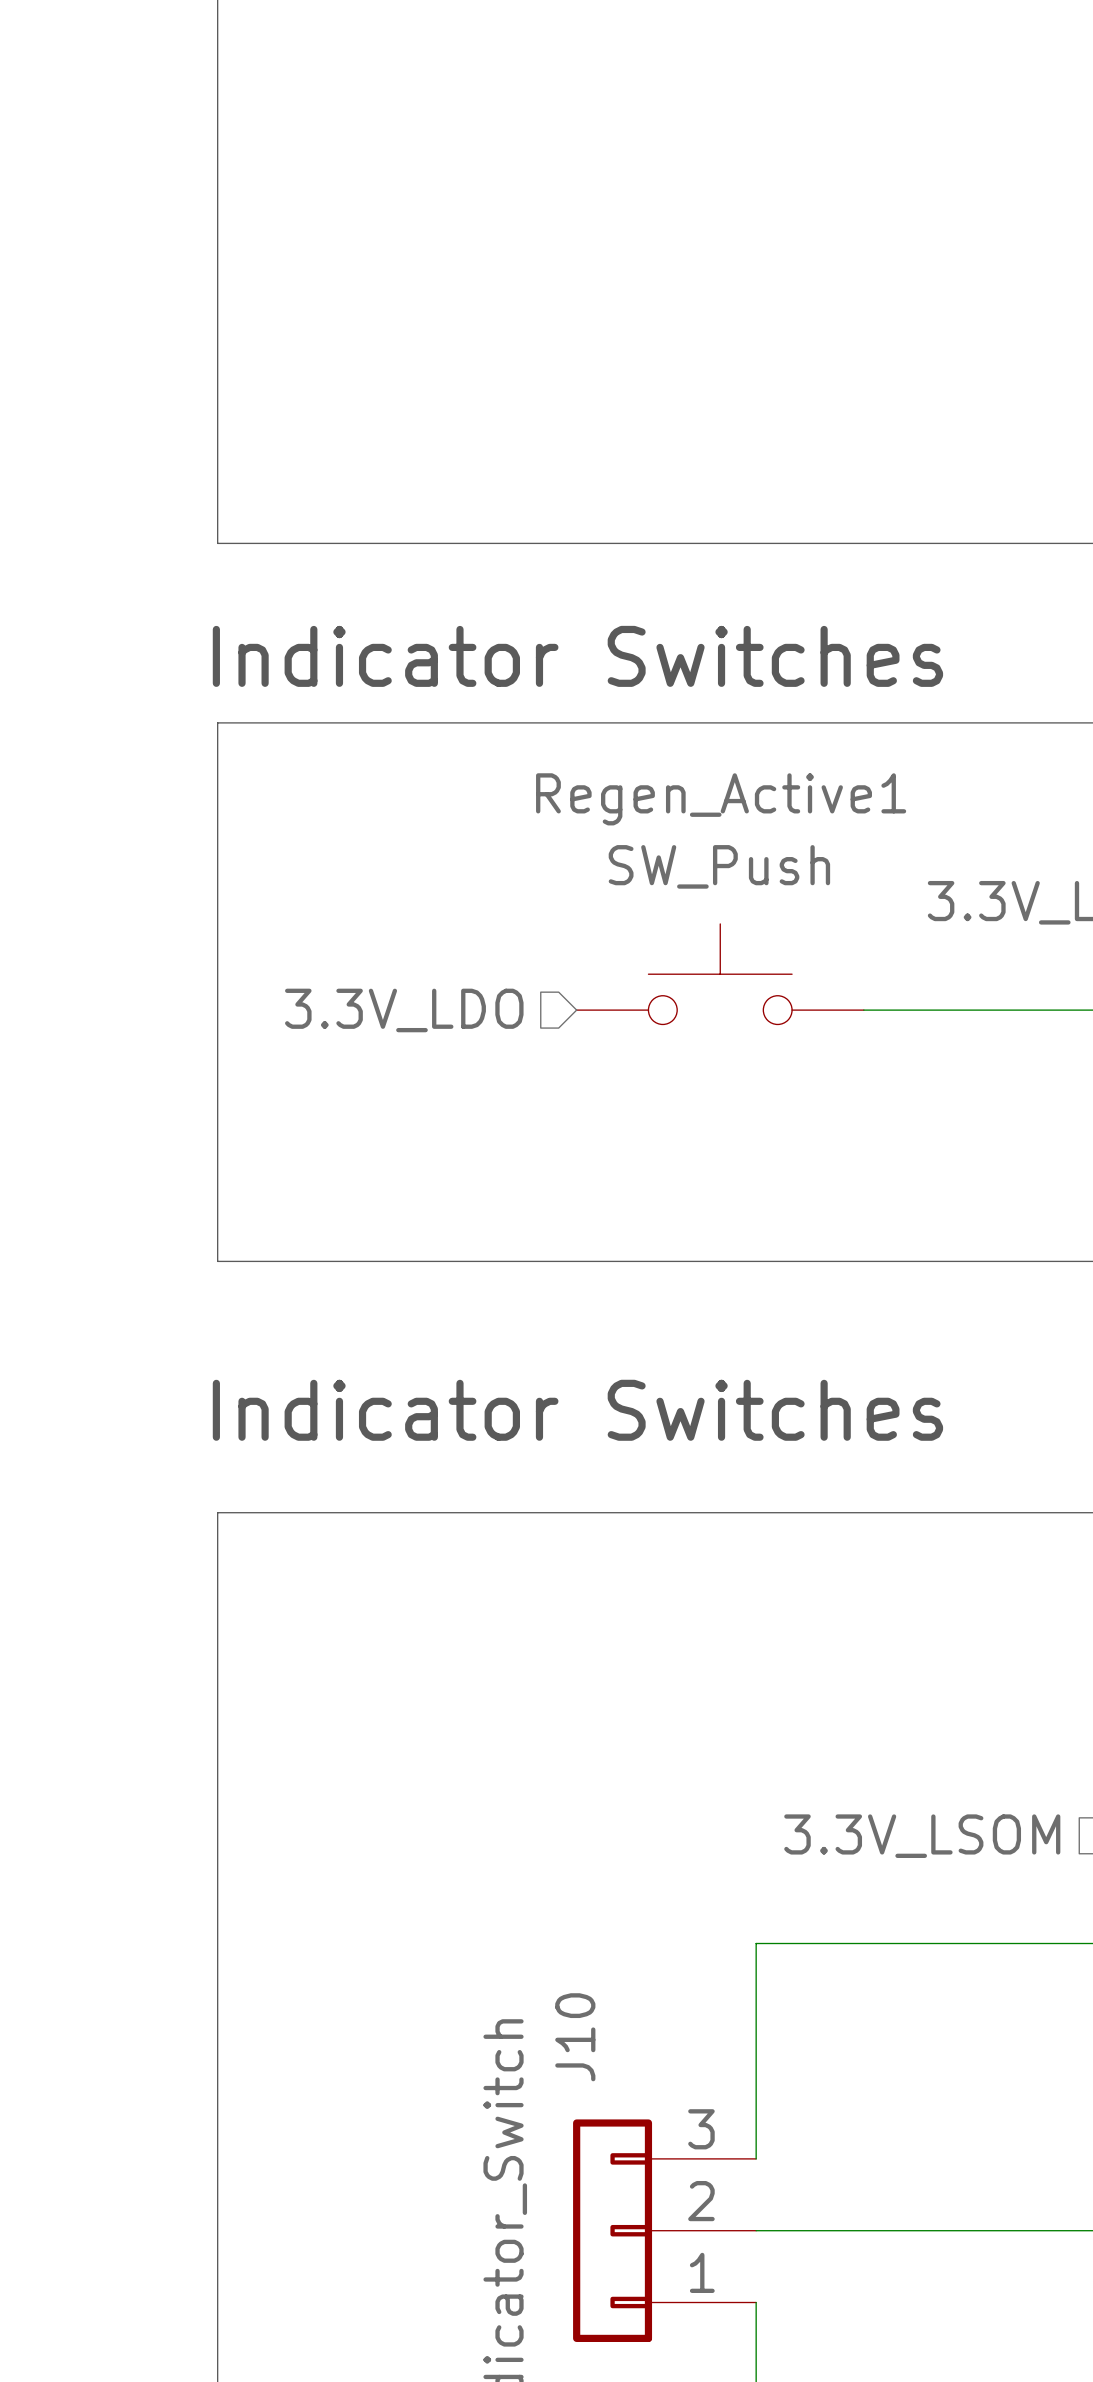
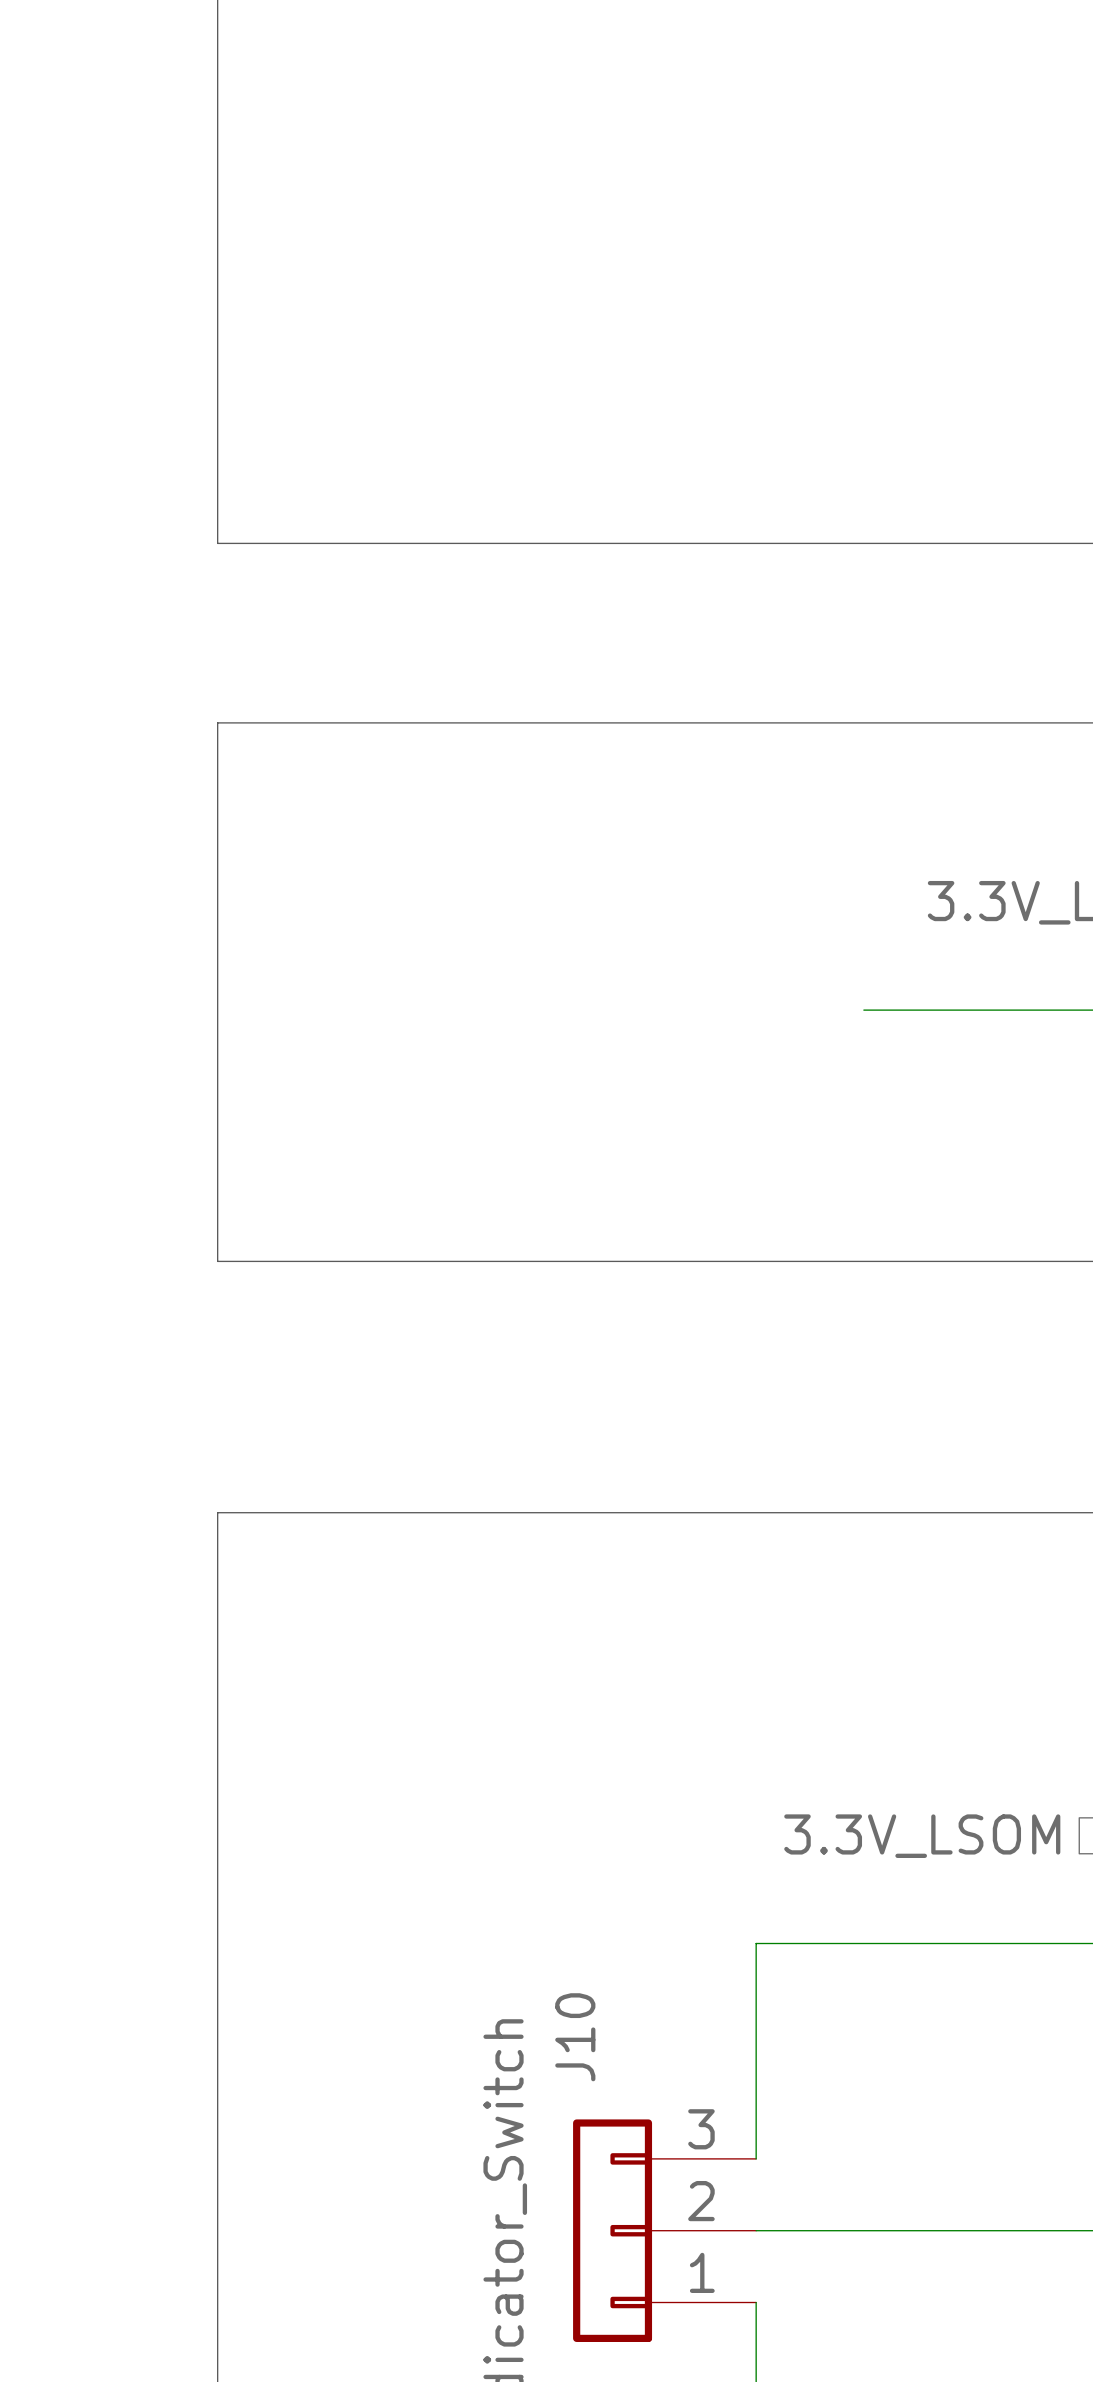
text: Indicator Switches (577, 656) -> none
Regen_Active1: SW_Push (720, 974) -> none
hierarchical label: 3.3V_LDO (404, 1010) -> none
text: Indicator Switches (577, 1410) -> none

